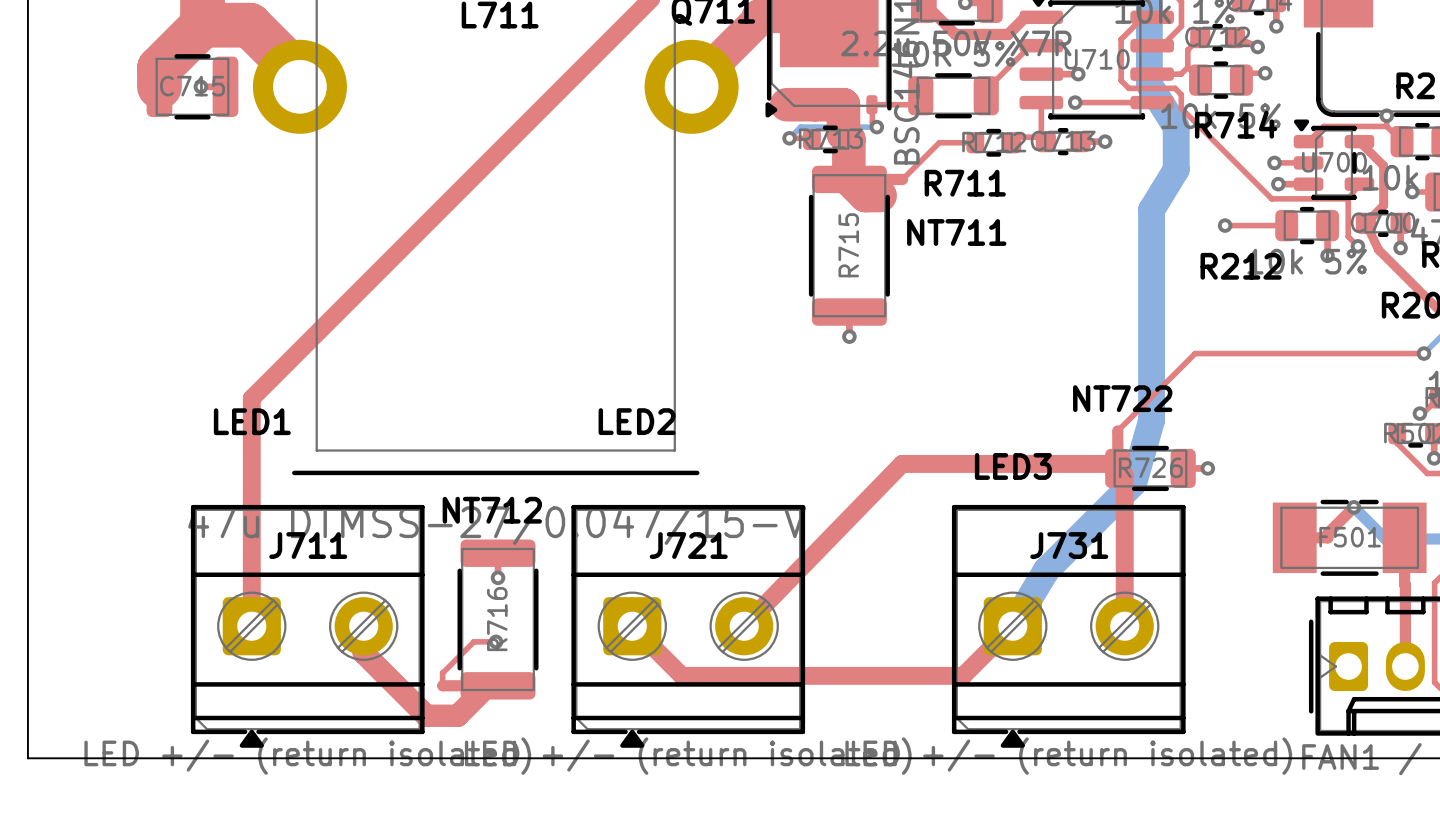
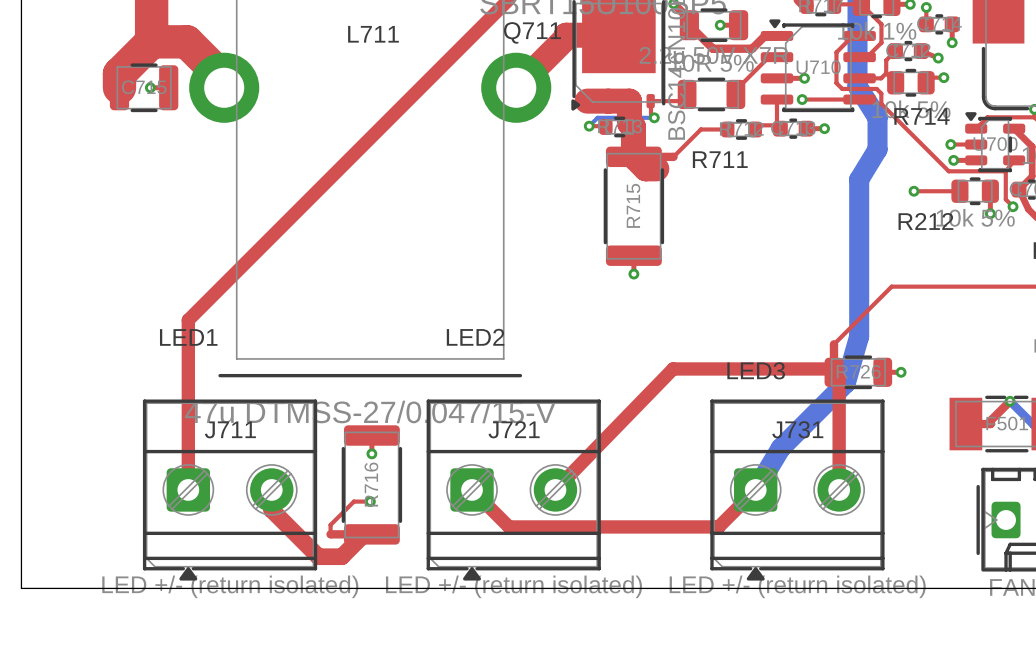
NT711 name: NT711 (956, 232) -> none
NT722 name: NT722 (1122, 398) -> none
NT712 name: NT712 (492, 510) -> none

